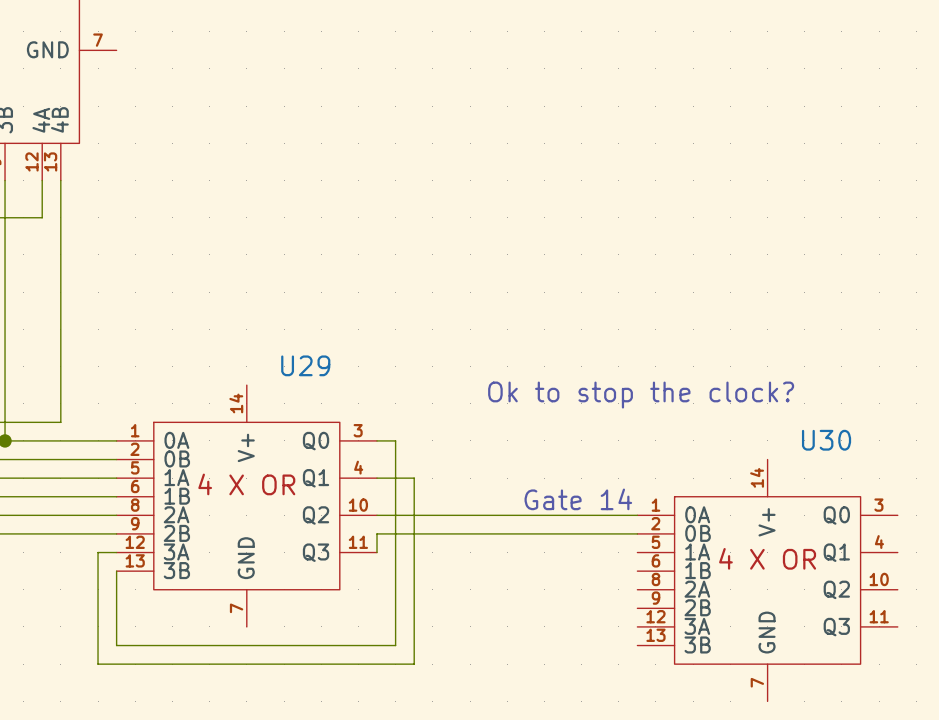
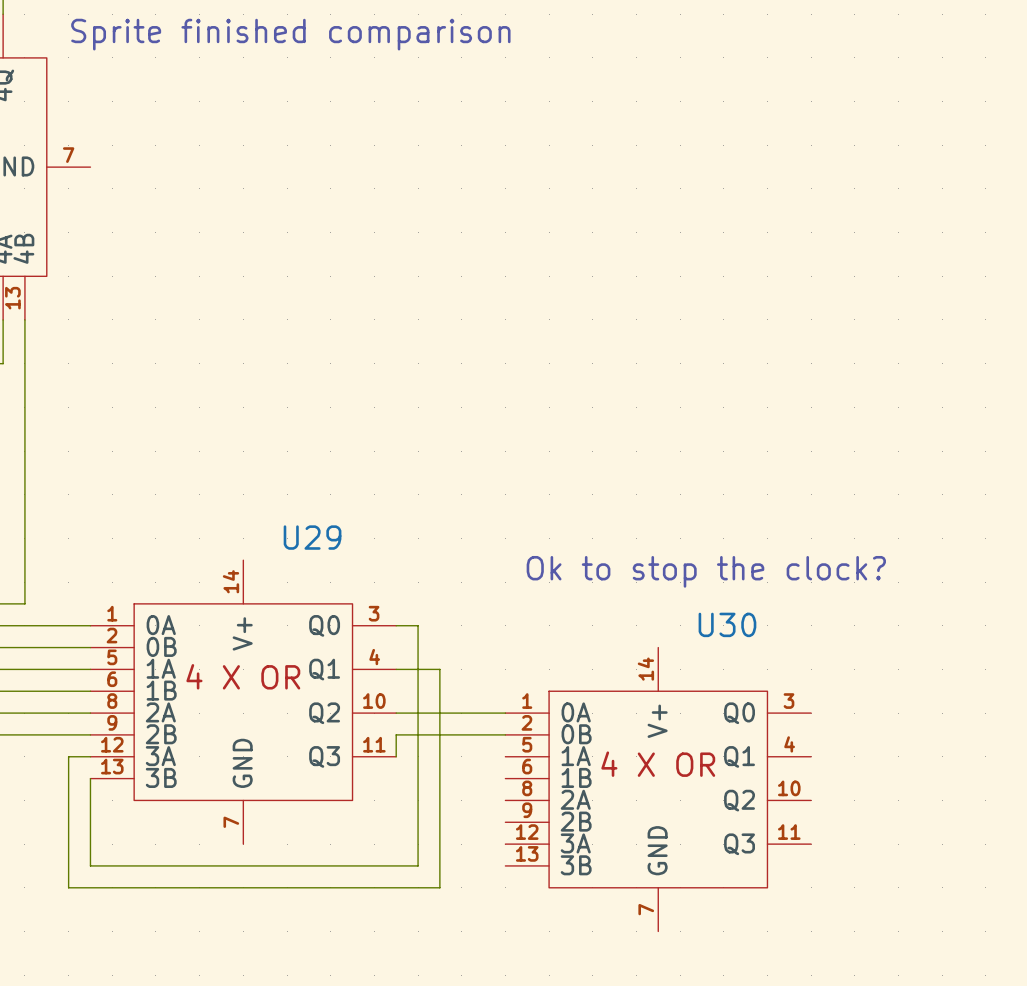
text: Gate 14 (578, 499) -> none
wire: (470, 515) (637, 515) -> none
wire: (470, 533) (637, 533) -> none
U30 position: (767, 580) -> (658, 789)

